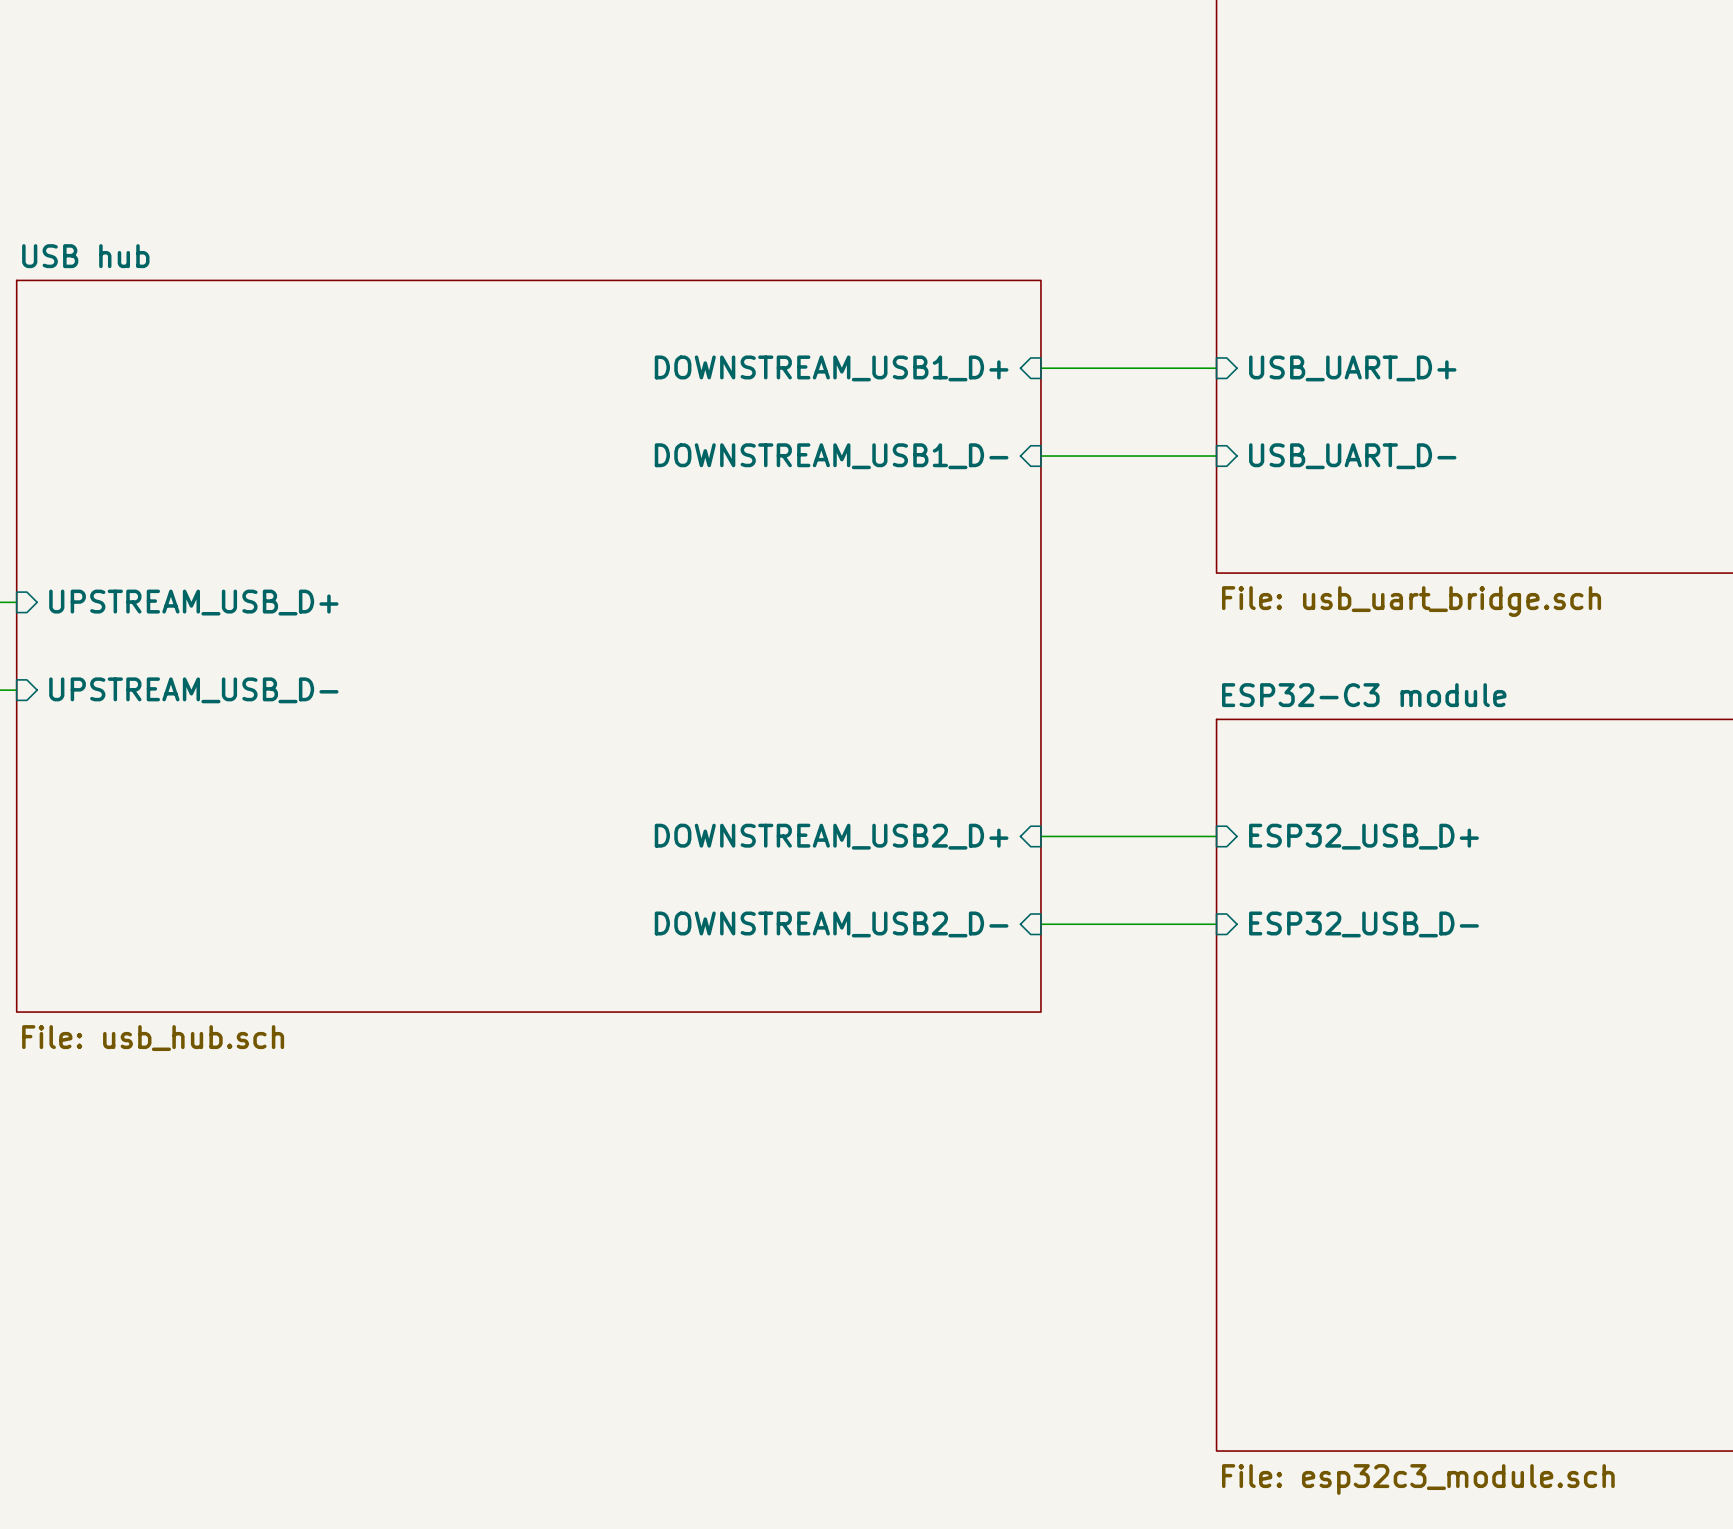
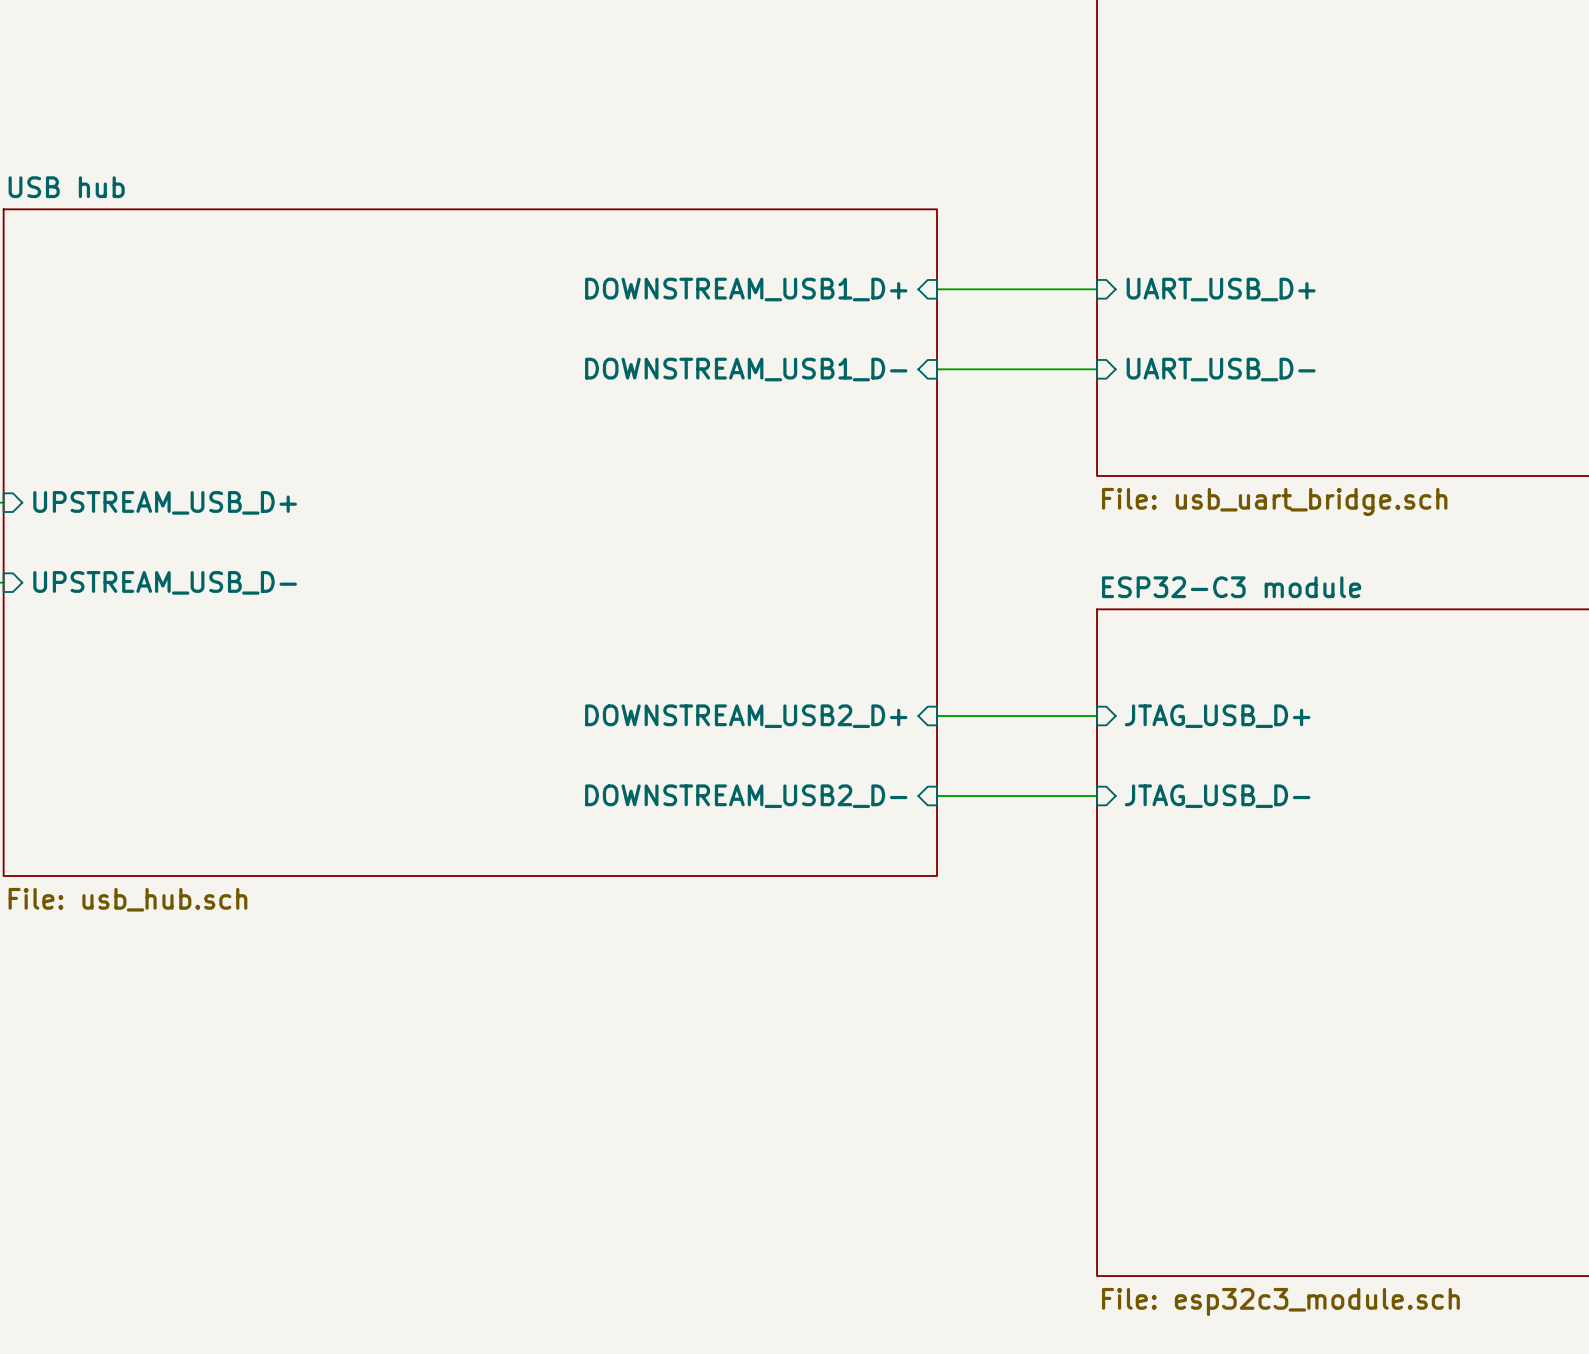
sheet pin: USB_UART_D+ (1352, 368) -> UART_USB_D+ (1221, 289)
sheet pin: USB_UART_D- (1352, 456) -> UART_USB_D- (1221, 369)
sheet pin: ESP32_USB_D+ (1363, 836) -> JTAG_USB_D+ (1217, 716)
sheet pin: ESP32_USB_D- (1363, 924) -> JTAG_USB_D- (1217, 796)

